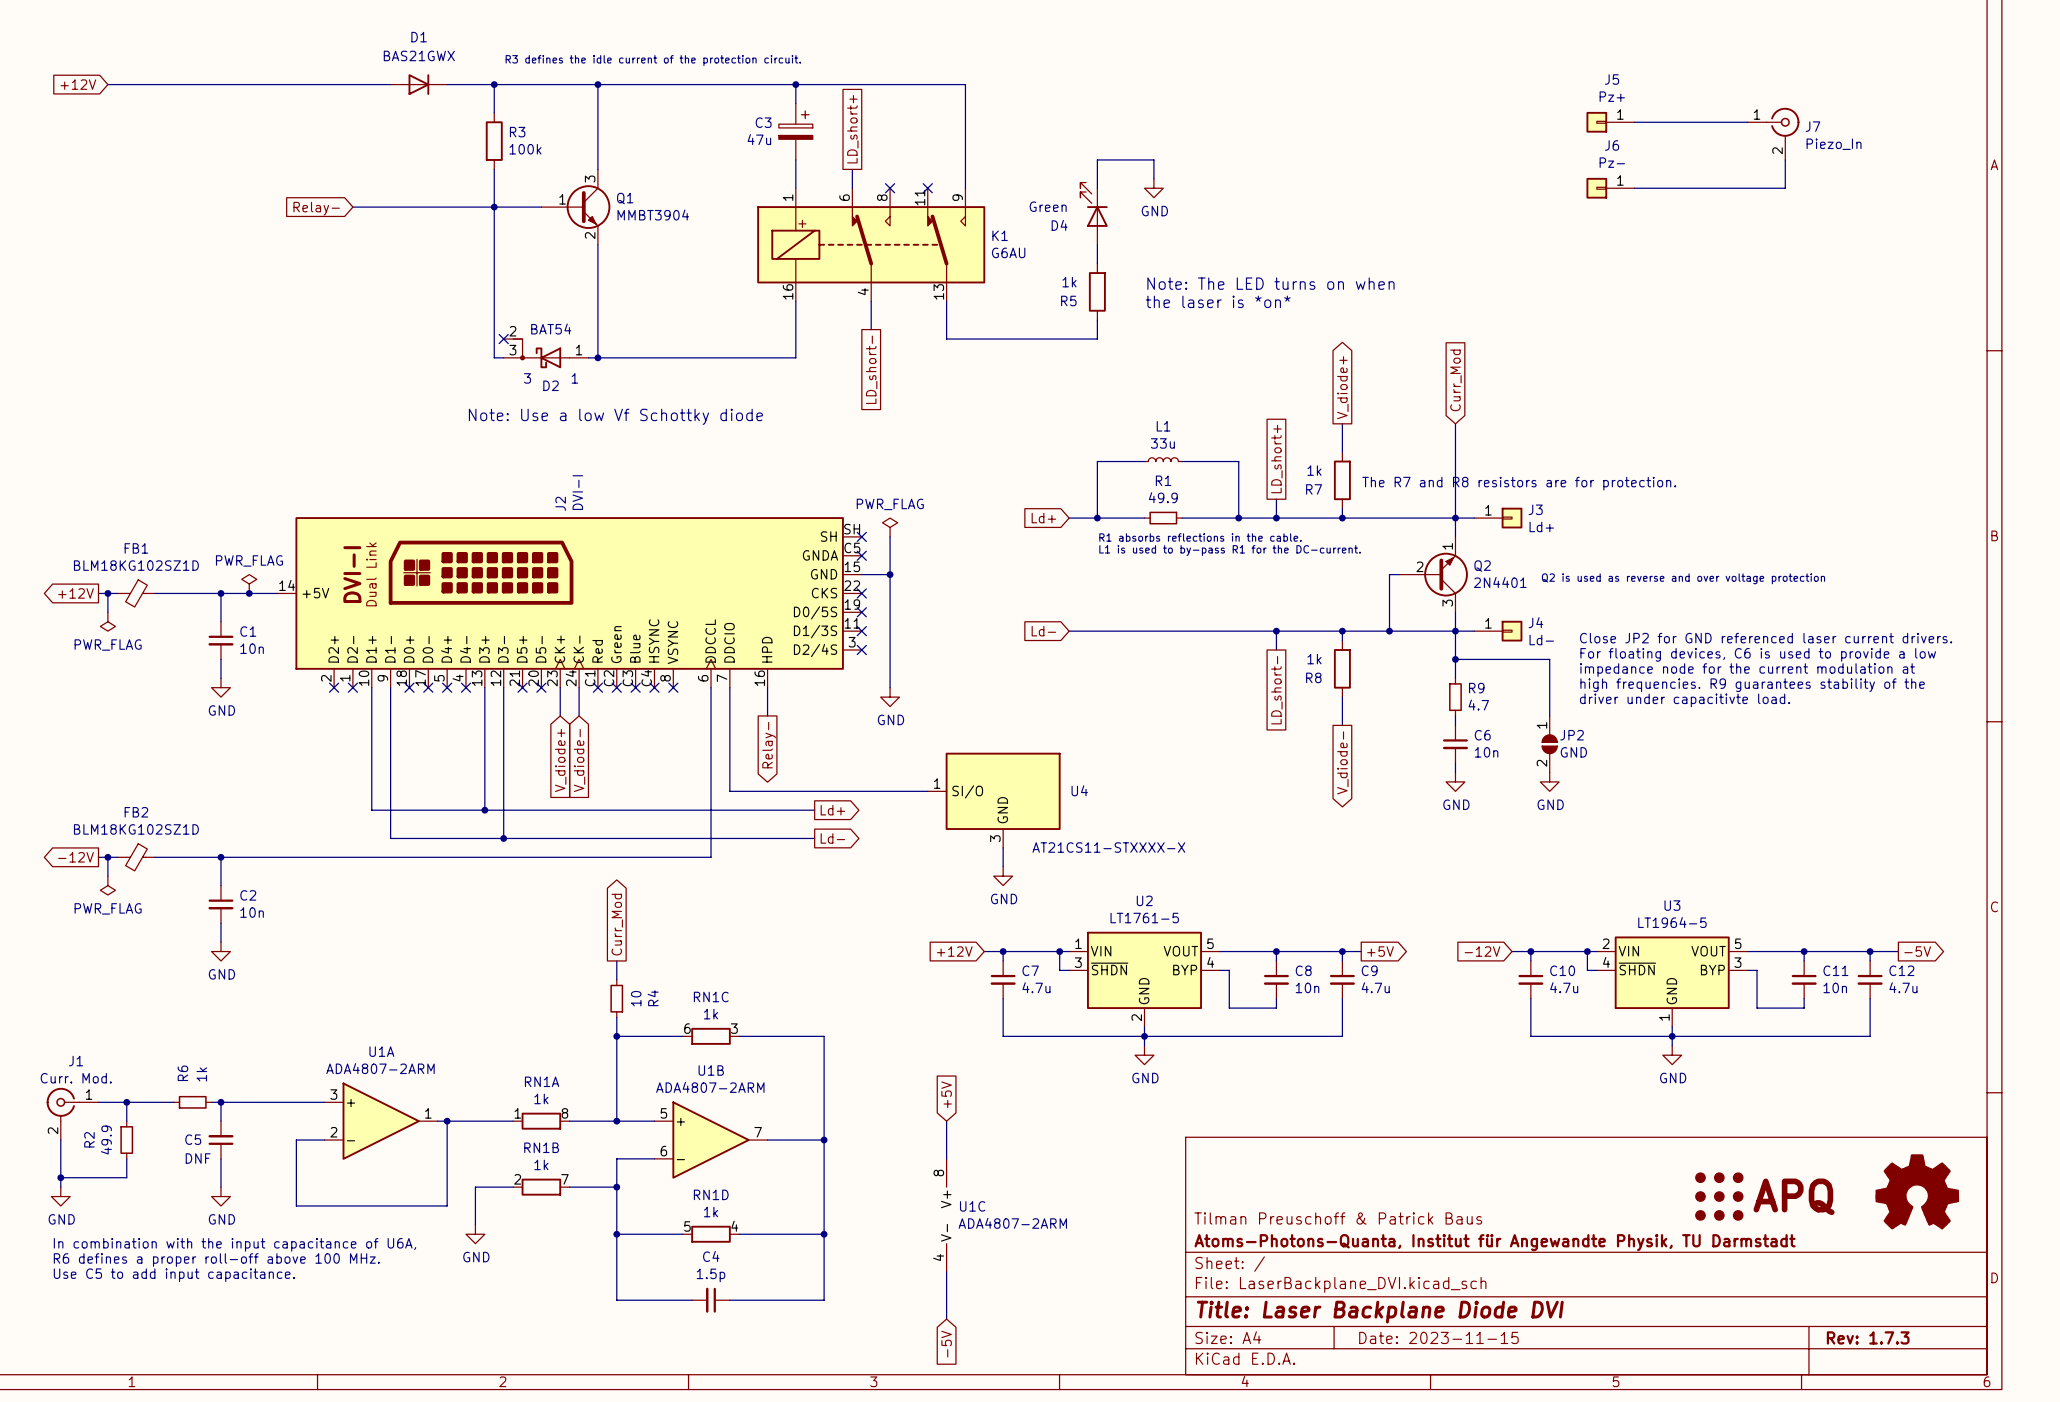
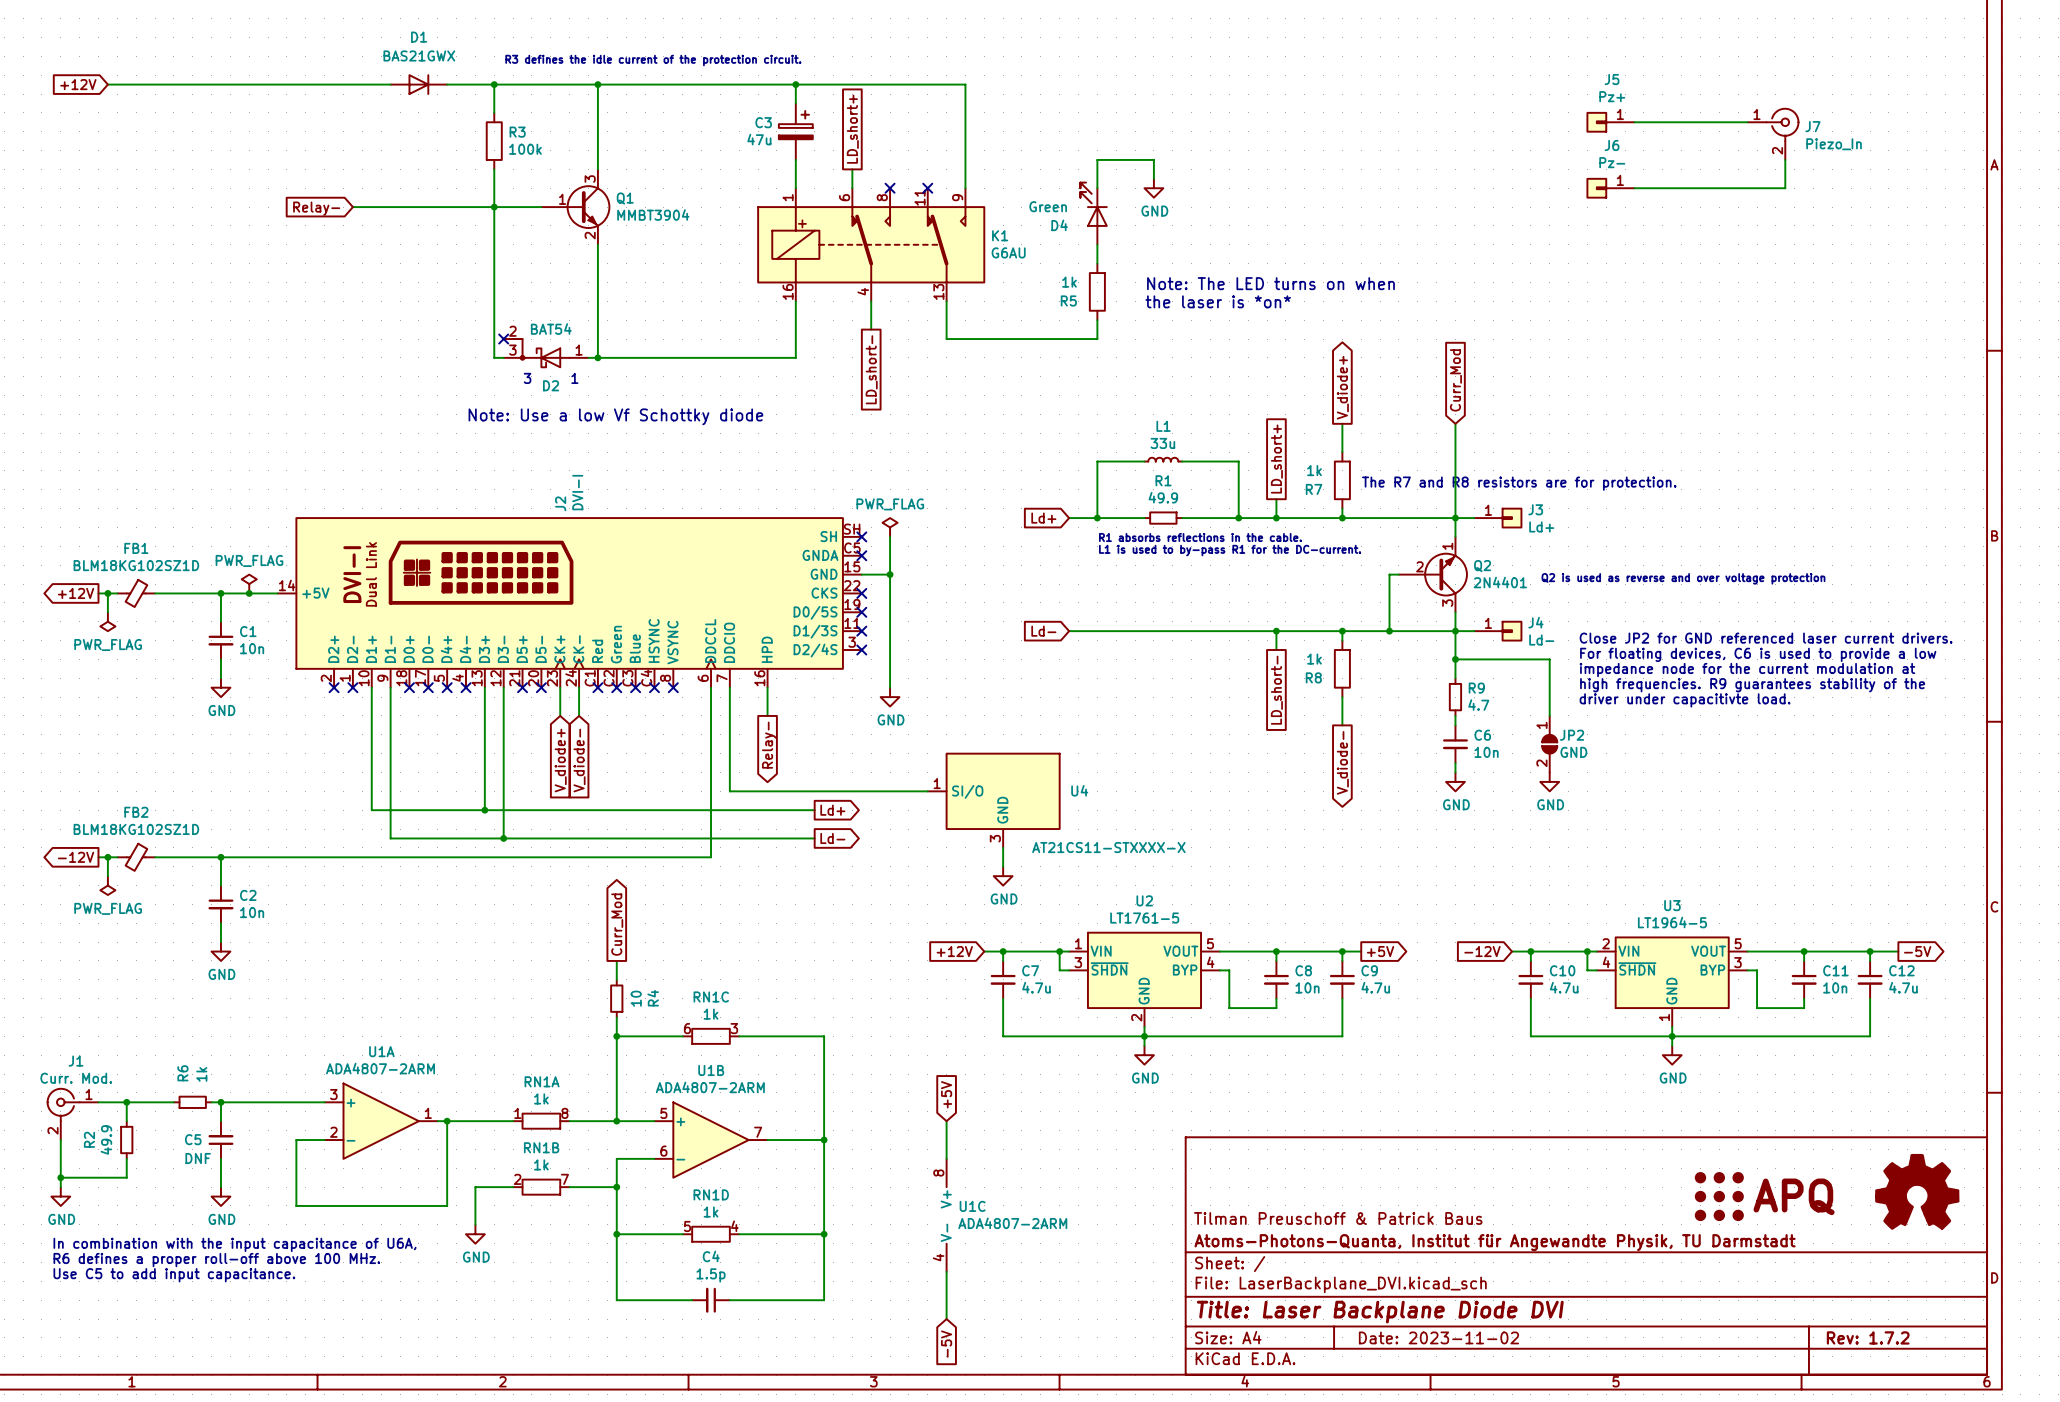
title block: Date: 2023-11-15 (1438, 1337) -> Date: 2023-11-02 (1438, 1337)
title block: Rev: 1.7.3 (1868, 1337) -> Rev: 1.7.2 (1868, 1337)

